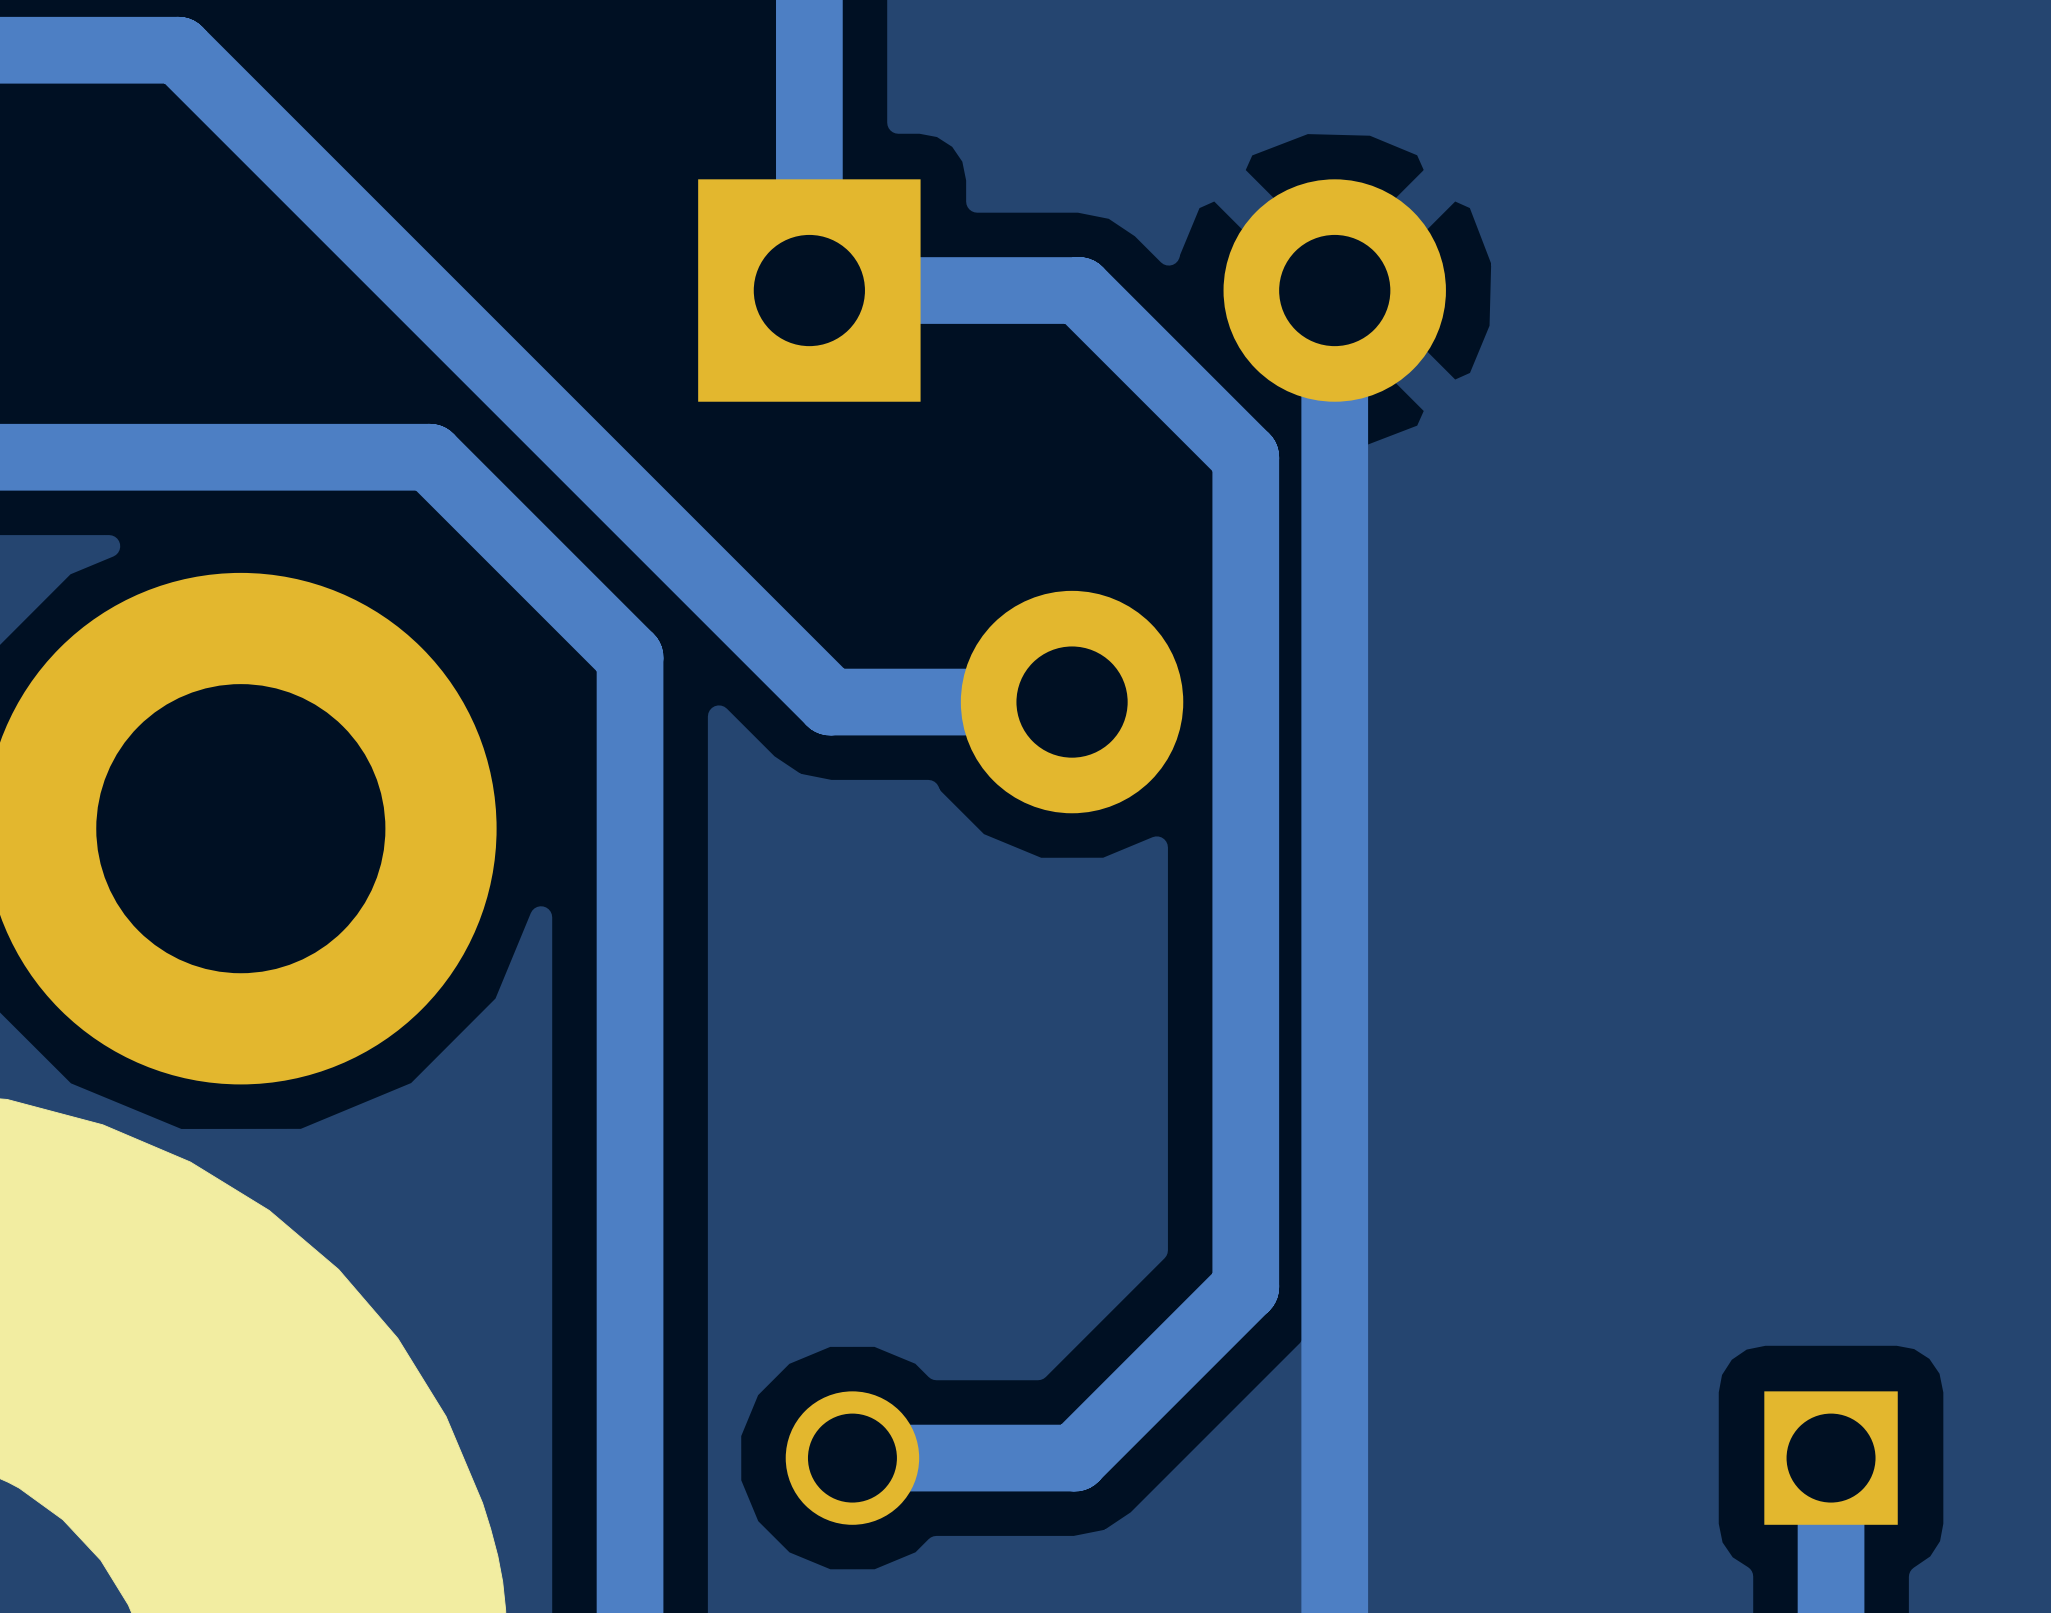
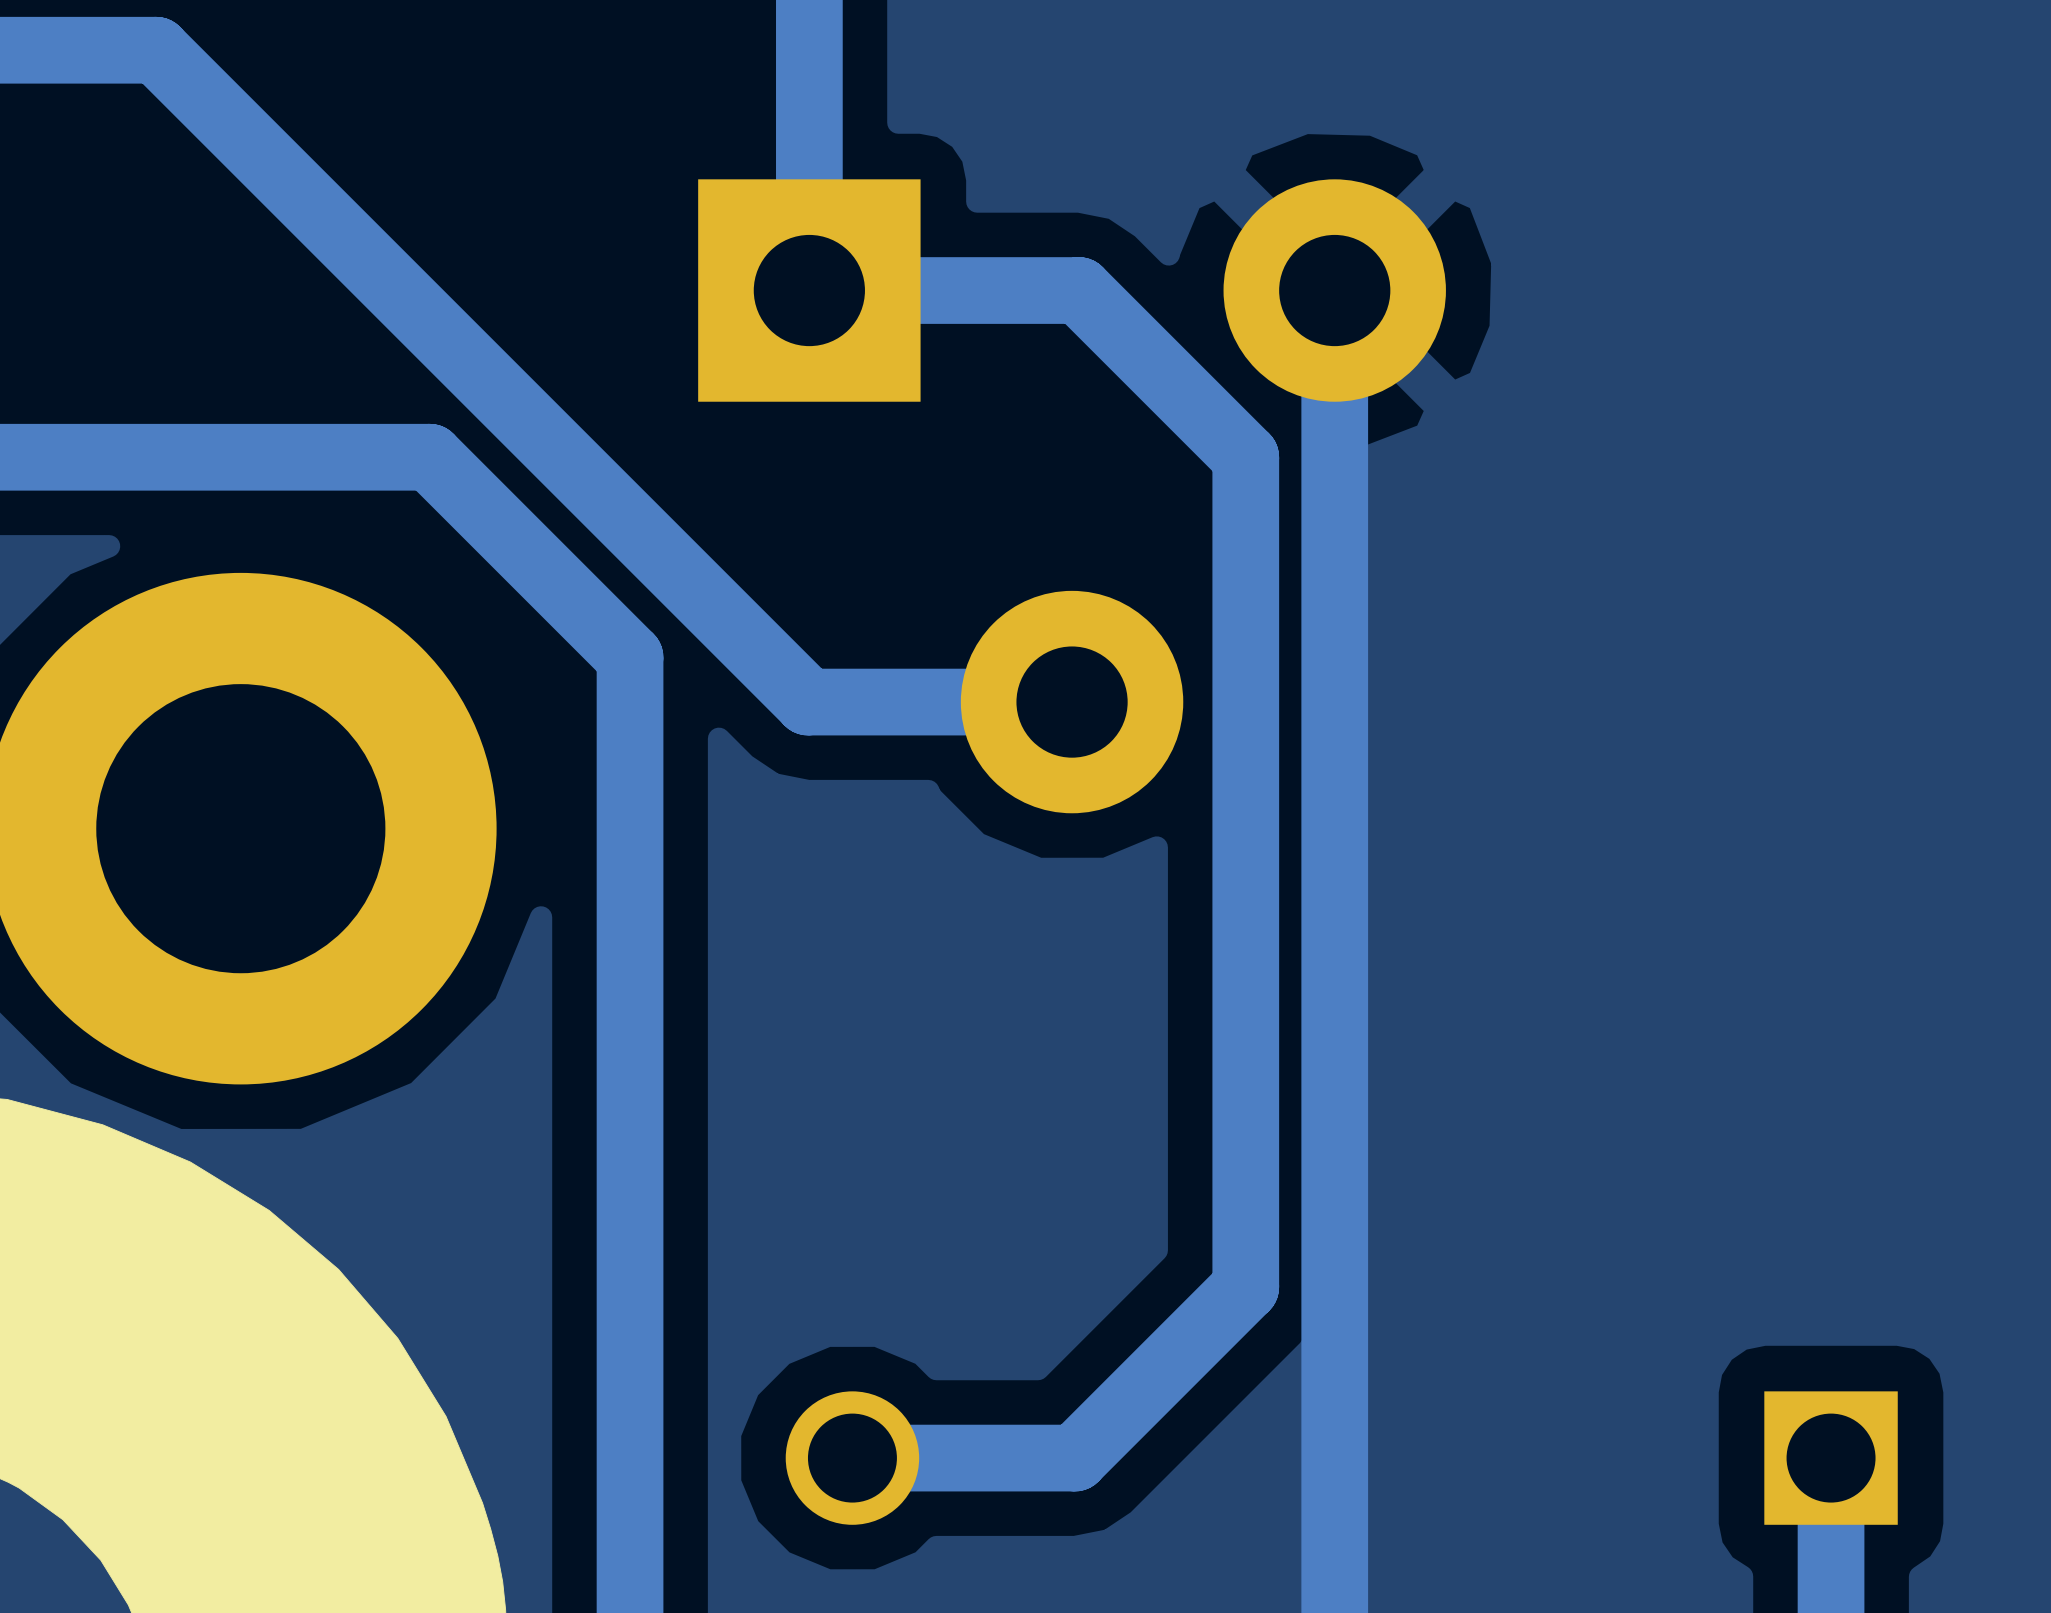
track: (156, 50) (178, 50) (830, 702) -> (156, 50) (808, 702) (830, 702)

